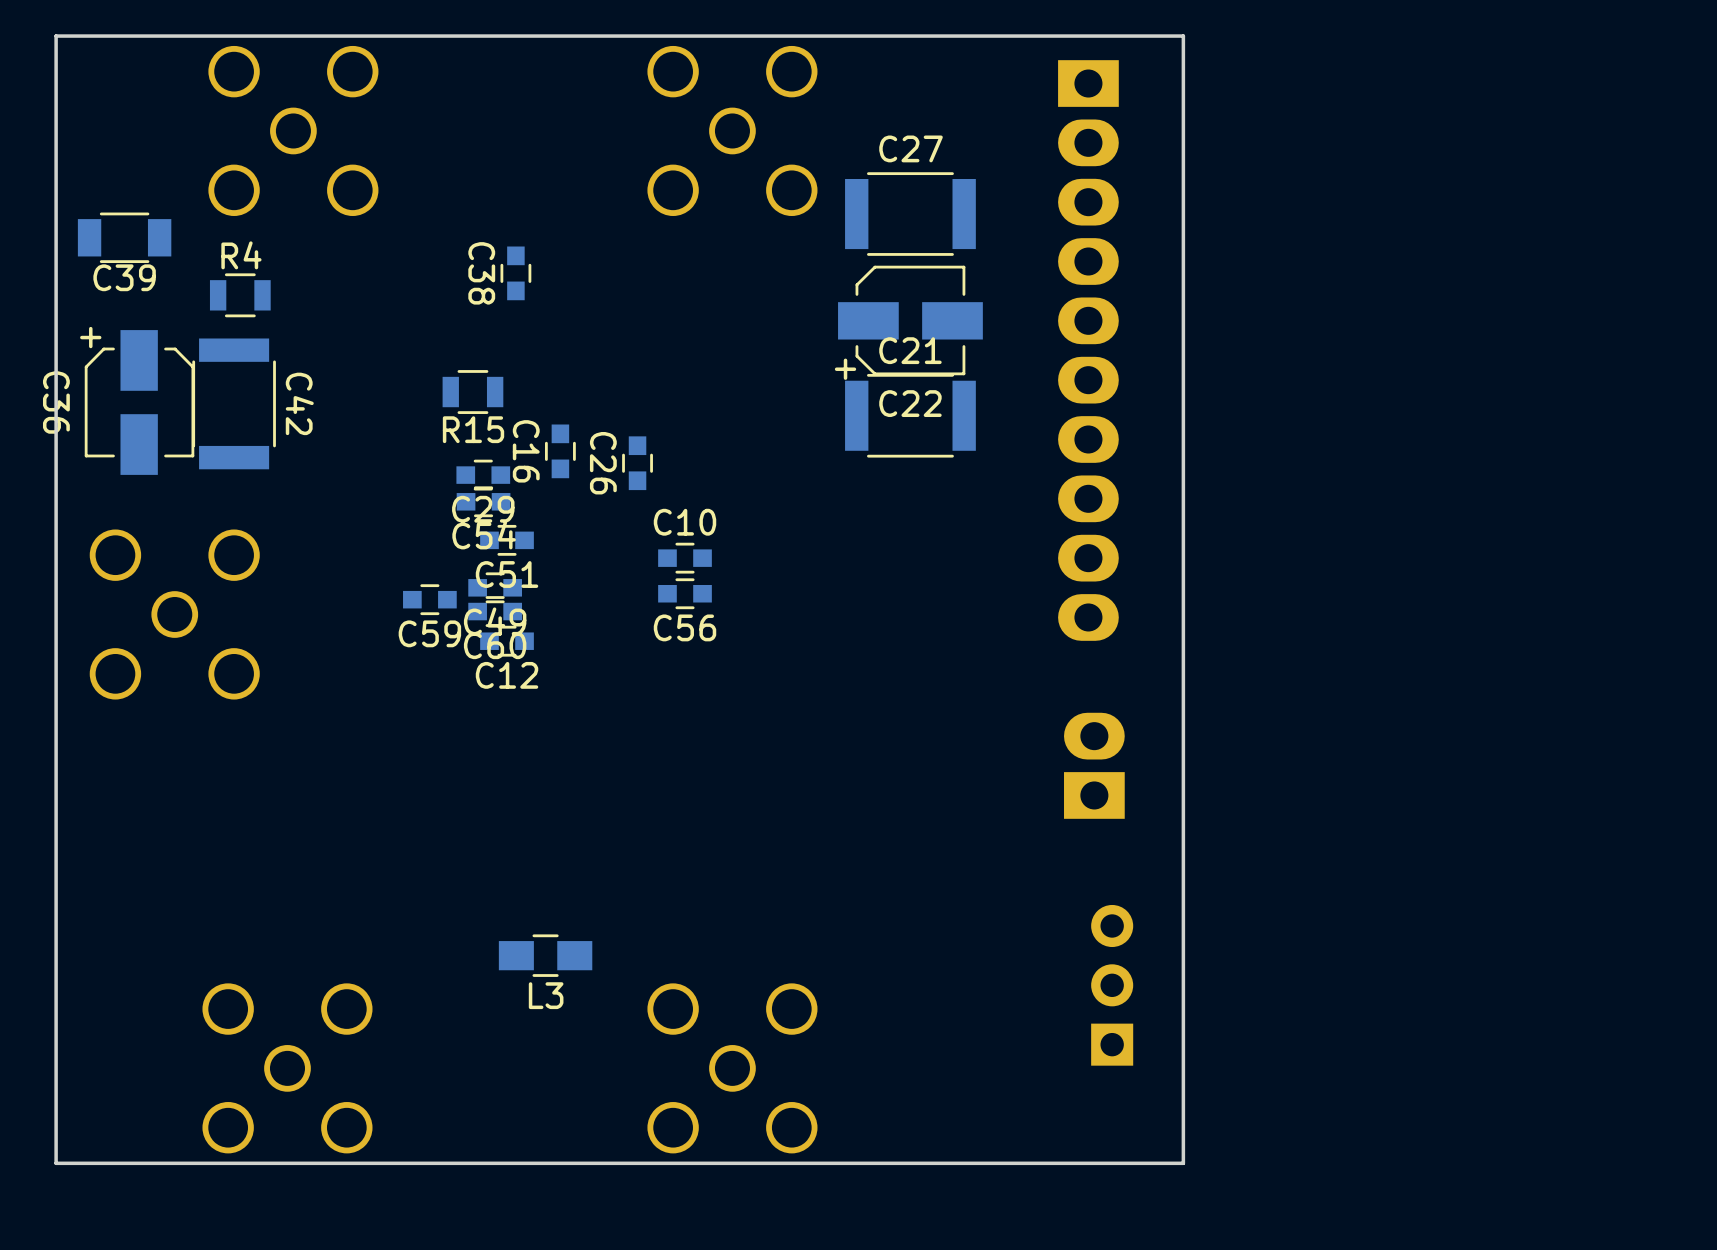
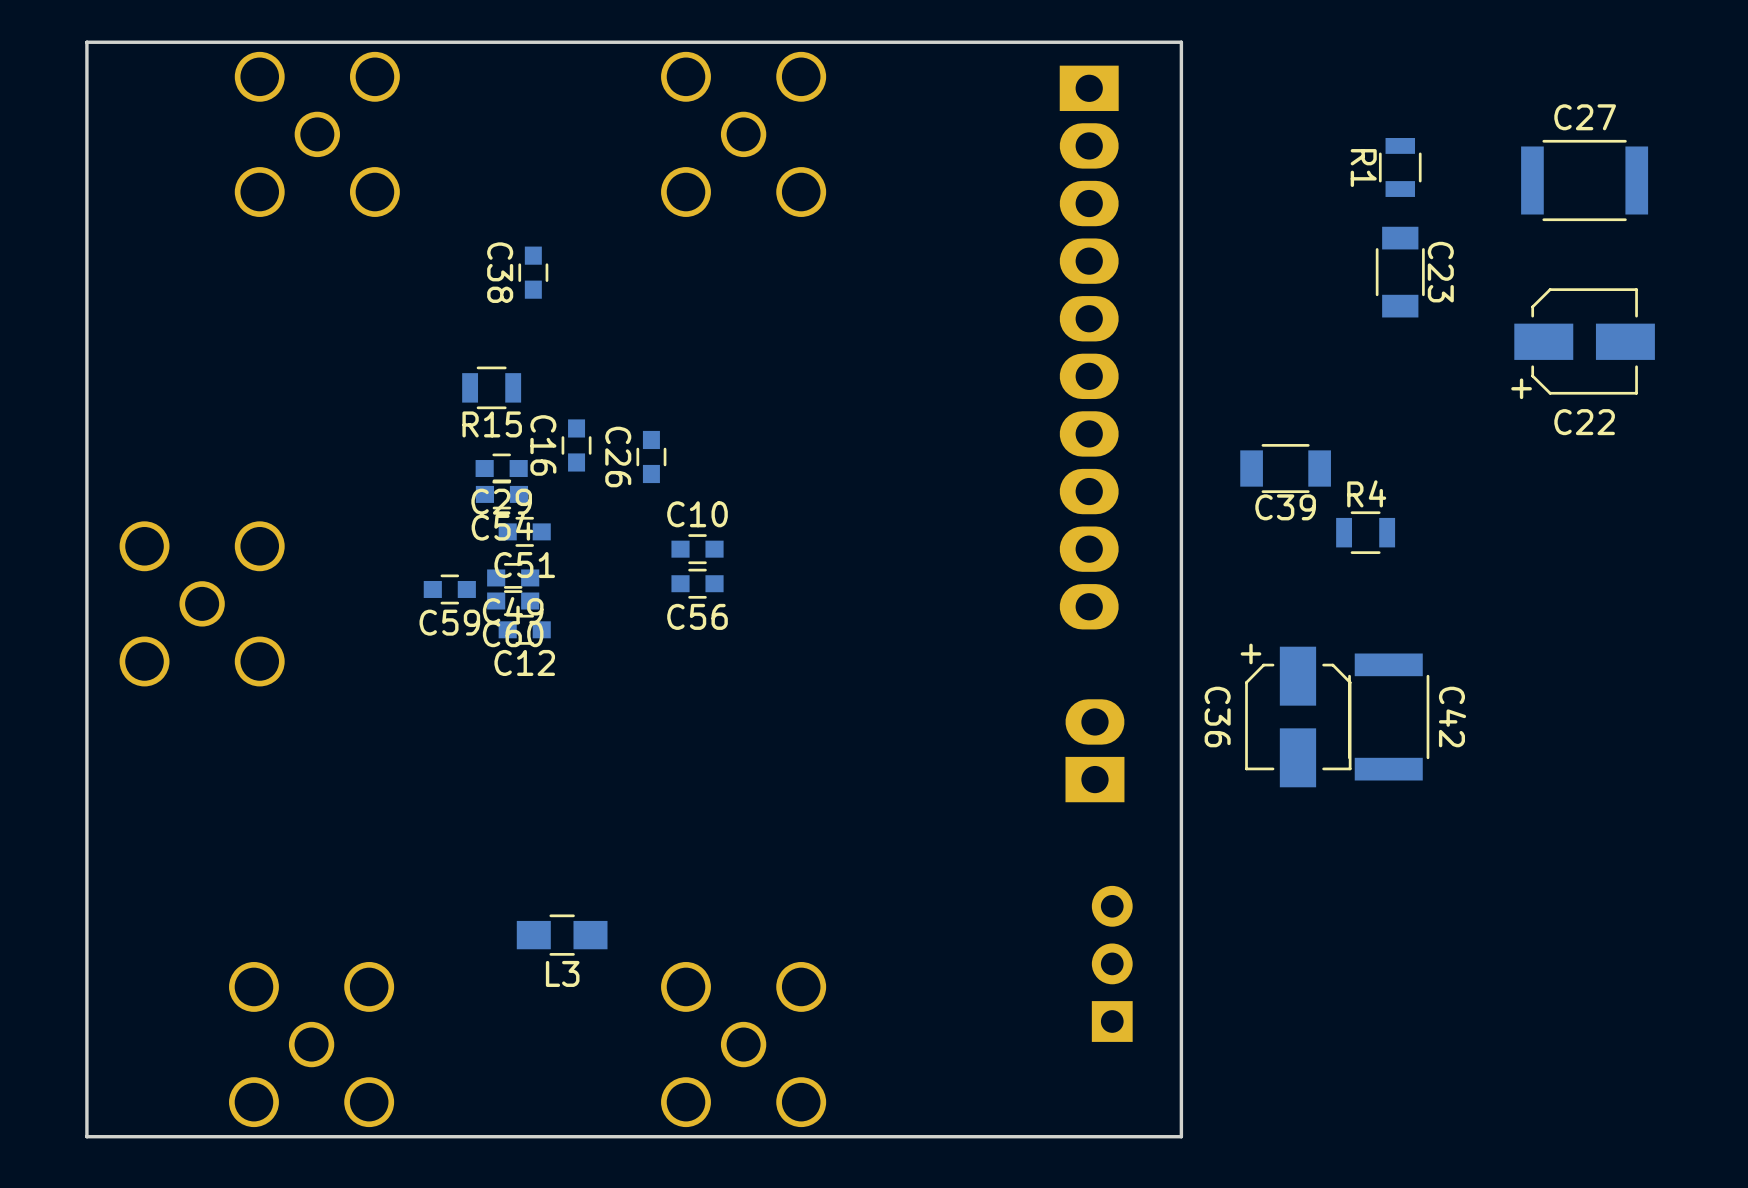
R1: none -> (1400, 167)
C27 position: (910, 214) -> (1584, 180)
C39 position: (124, 237) -> (1285, 468)
C23: none -> (1400, 272)
R4 position: (240, 295) -> (1365, 532)
C22 position: (910, 320) -> (1584, 341)
C36 position: (139, 402) -> (1298, 716)
C42 position: (234, 403) -> (1388, 716)
C21: (910, 415) -> none

